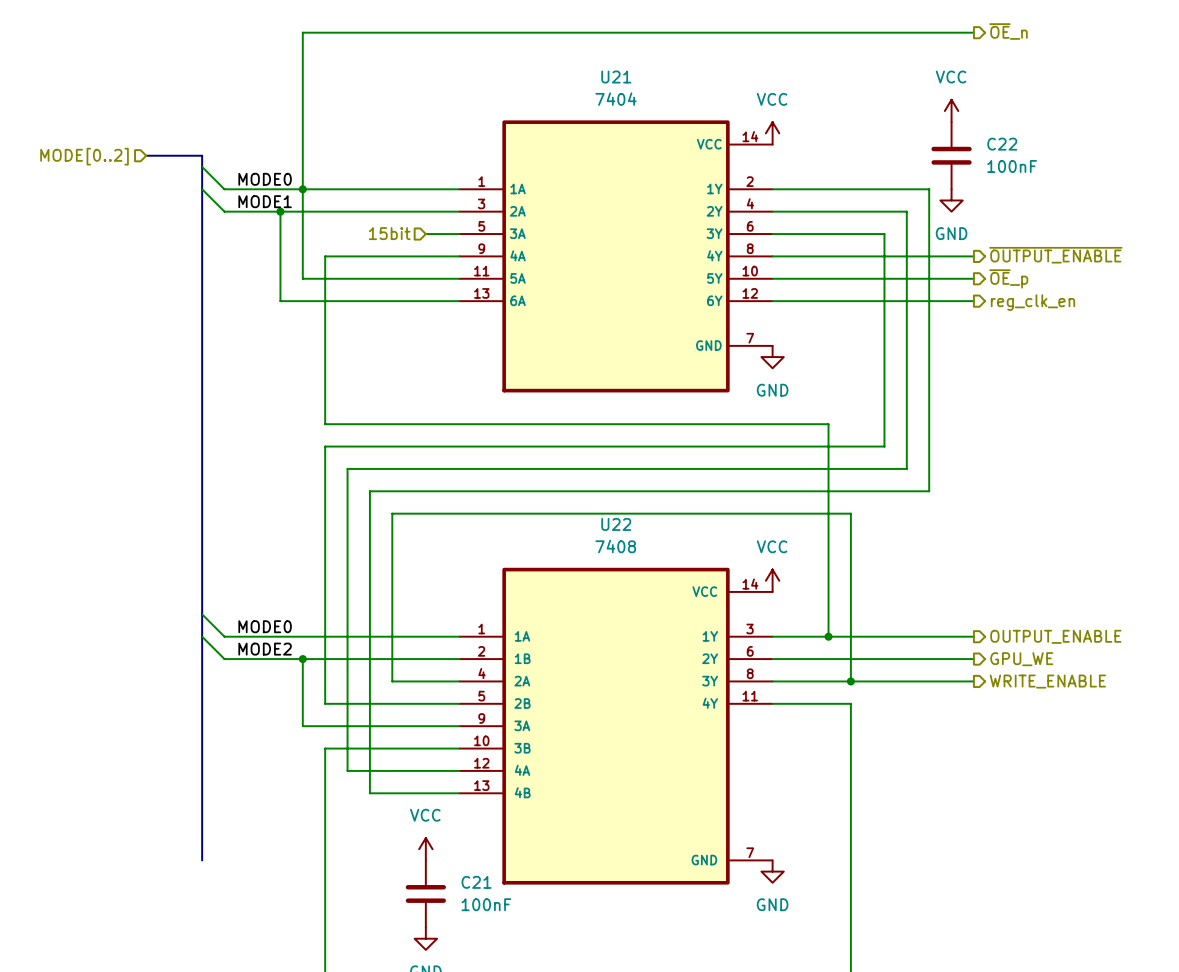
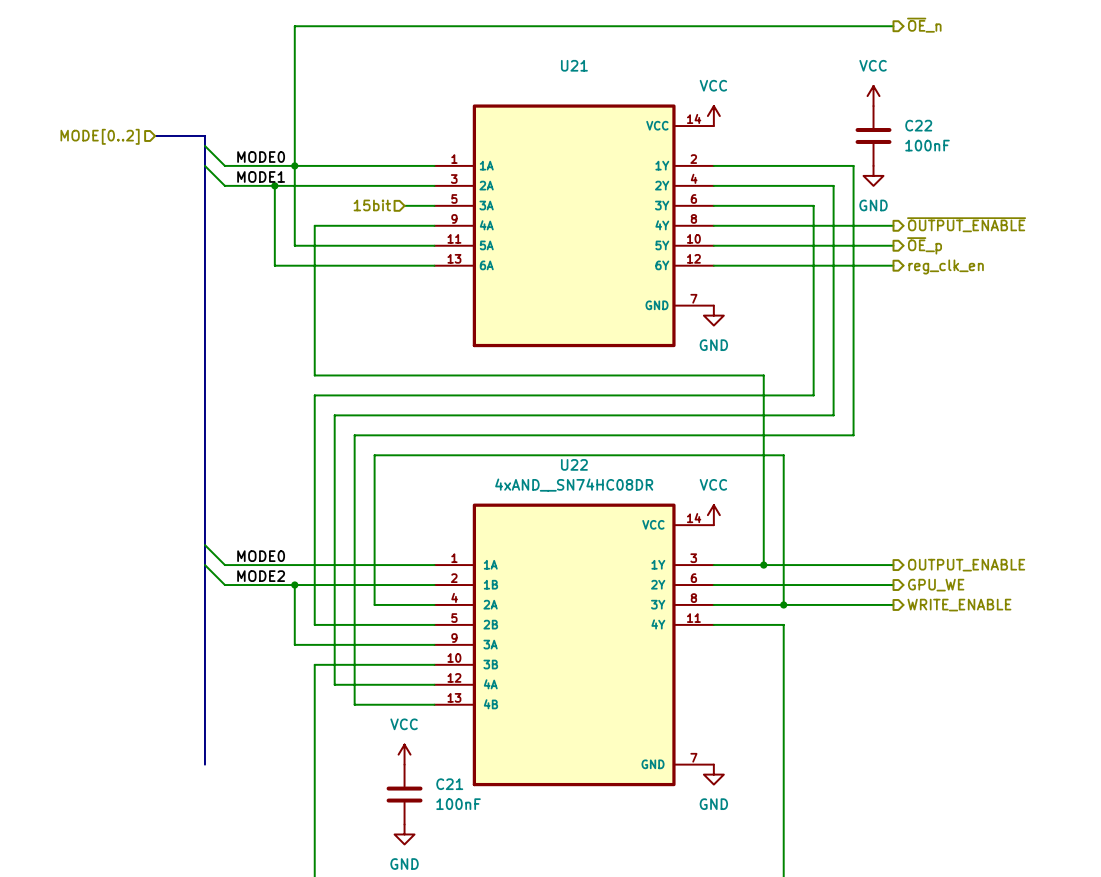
U21 value: 7404 (616, 99) -> none
U22 value: 7408 (615, 546) -> 4xAND__SN74HC08DR (574, 485)

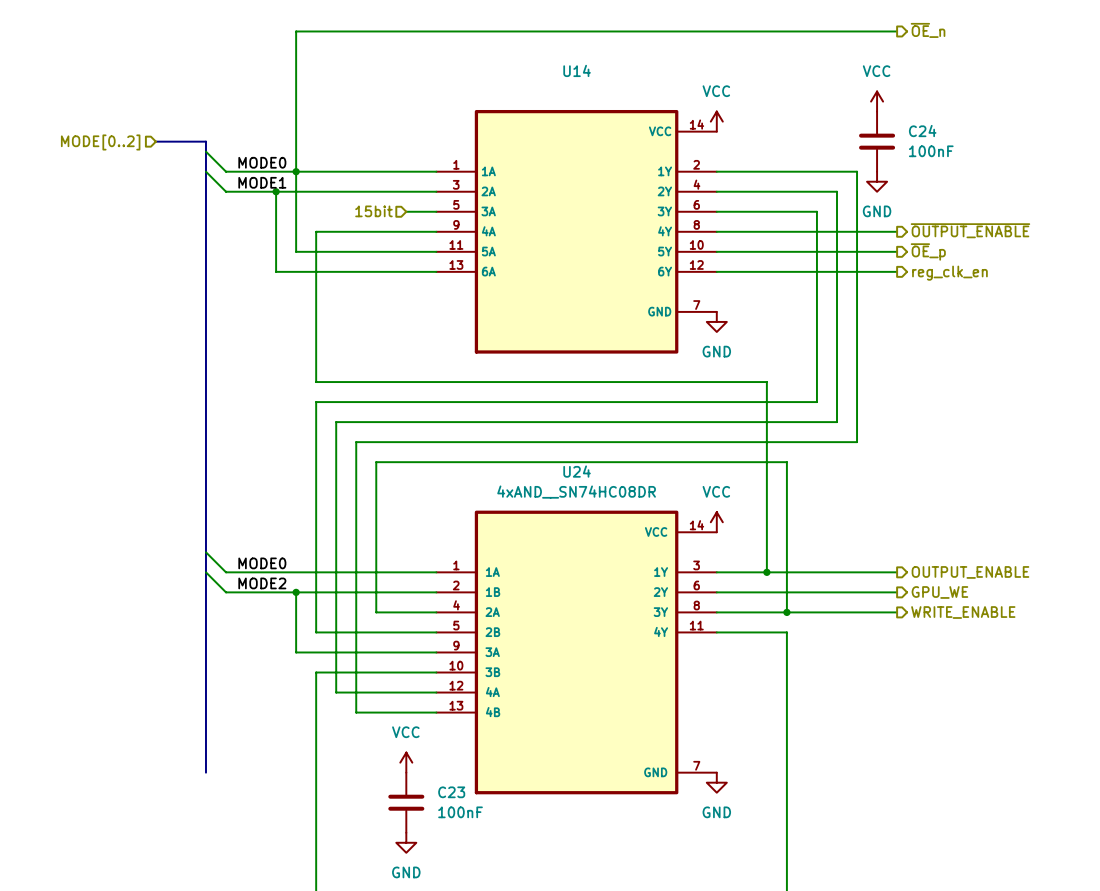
U21 name: U21 (574, 65) -> U14 (577, 70)
C22 name: C22 (918, 125) -> C24 (922, 131)
U22 name: U22 (574, 464) -> U24 (577, 471)
C21 name: C21 (449, 784) -> C23 (451, 792)

